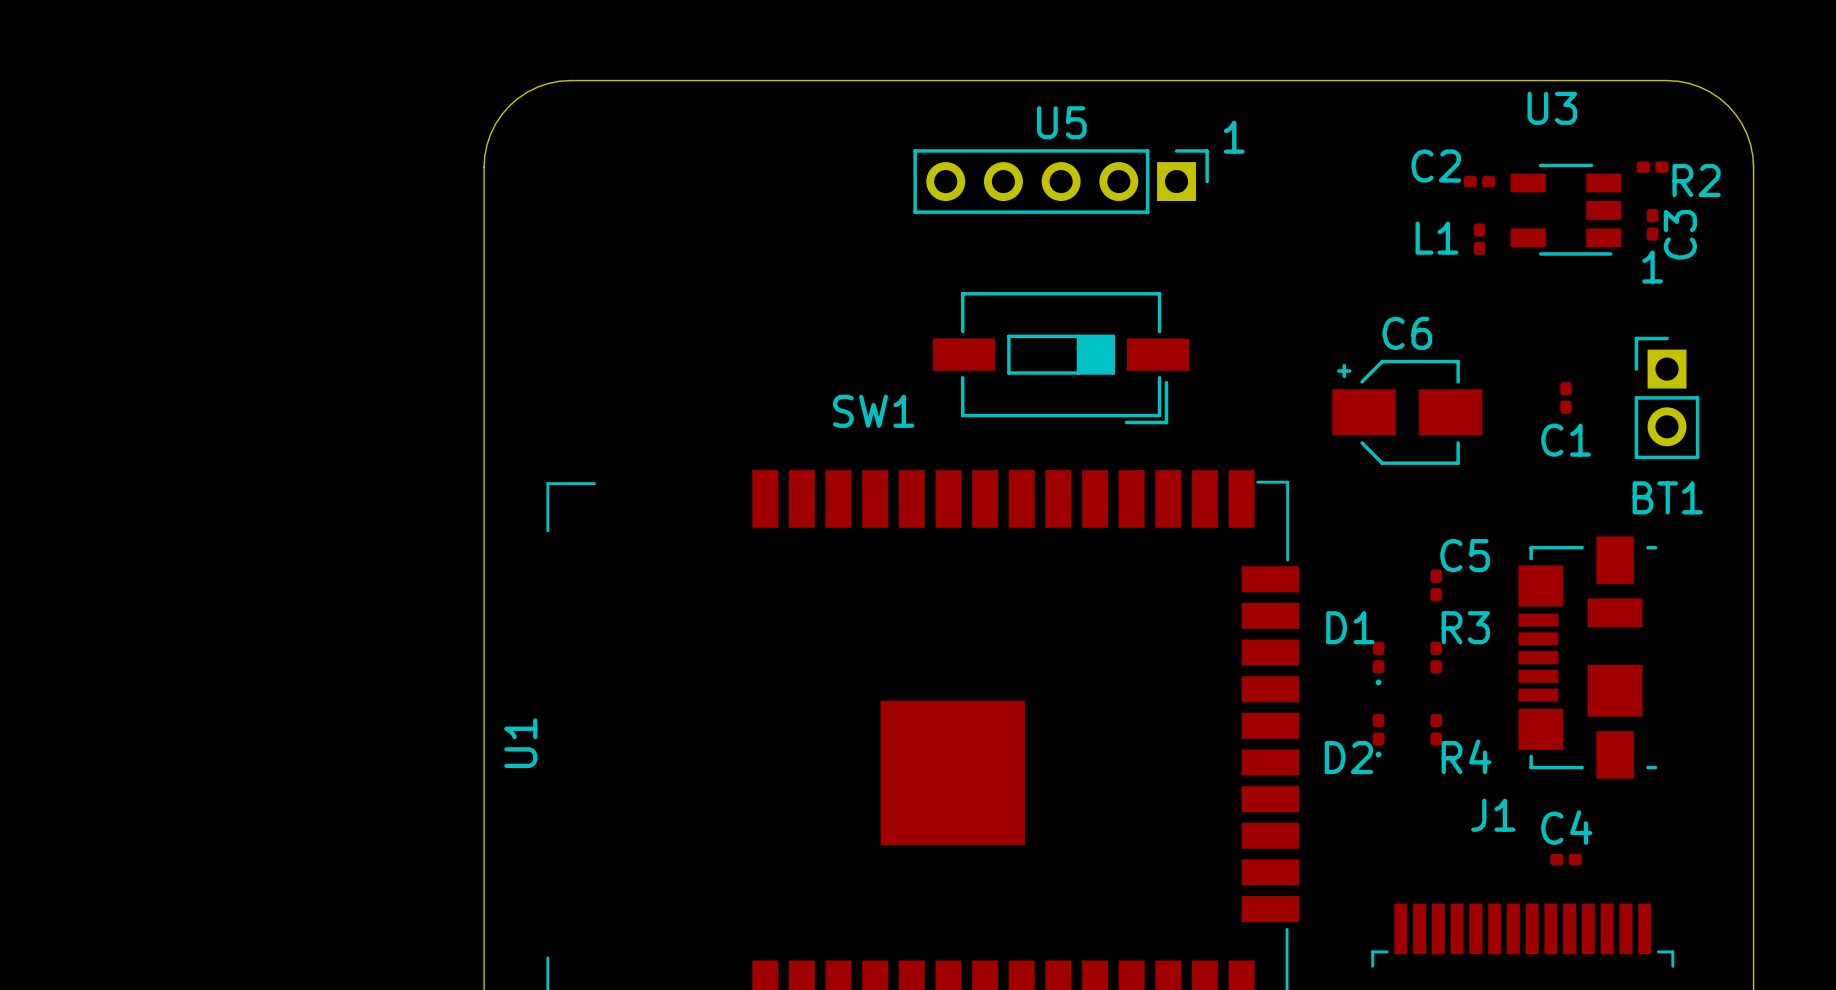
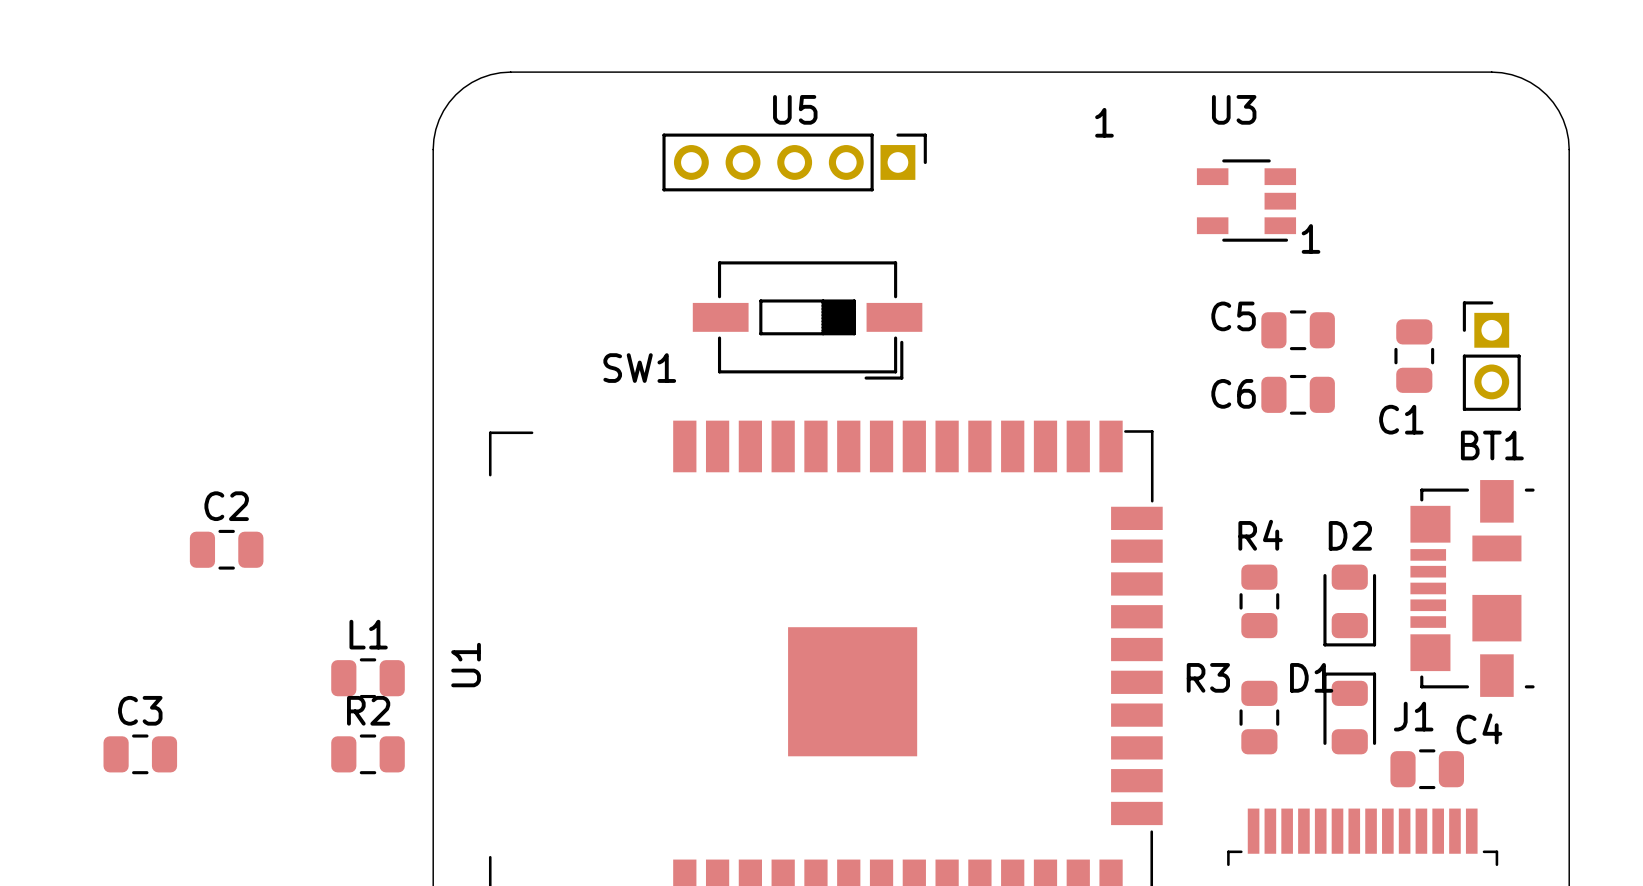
R2 footprint: [1636, 161, 1669, 173] -> [331, 734, 405, 775]
C2 footprint: [1463, 175, 1496, 188] -> [189, 529, 264, 570]
R2 name position: R2 (1696, 180) -> R2 (368, 710)
U5 position: (1061, 181) -> (794, 162)
C3 footprint: [1646, 208, 1659, 241] -> [103, 734, 178, 775]
U3 position: (1566, 209) -> (1246, 200)
L1 footprint: [1473, 223, 1486, 256] -> [331, 658, 405, 699]
C3 name position: C3 (1680, 234) -> C3 (140, 710)
L1 name position: L1 (1436, 238) -> L1 (368, 634)
text position: 1 (1652, 267) -> 1 (1311, 238)
C6 name position: C6 (1407, 333) -> C6 (1233, 393)
SW1 position: (1061, 358) -> (807, 320)
C6 footprint: [1332, 359, 1483, 465] -> [1261, 374, 1335, 415]
C1 footprint: [1560, 382, 1572, 414] -> [1394, 319, 1435, 393]
C5 name position: C5 (1465, 555) -> C5 (1233, 316)
C5 footprint: [1430, 569, 1442, 602] -> [1261, 310, 1335, 351]
R3 name position: R3 (1465, 627) -> R3 (1208, 677)
D1 footprint: [1372, 641, 1385, 686] -> [1323, 672, 1377, 755]
R3 footprint: [1430, 641, 1442, 674] -> [1239, 680, 1280, 755]
J1 position: (1587, 657) -> (1472, 588)
D2 footprint: [1372, 713, 1385, 758] -> [1323, 564, 1377, 647]
R4 footprint: [1430, 713, 1442, 746] -> [1239, 564, 1280, 639]
R4 name position: R4 (1466, 756) -> R4 (1260, 535)
D2 name position: D2 (1348, 757) -> D2 (1350, 535)
J1 name position: J1 (1493, 815) -> J1 (1413, 716)
C4 name position: C4 (1566, 827) -> C4 (1479, 728)
C4 footprint: [1550, 853, 1582, 866] -> [1390, 749, 1465, 790]

